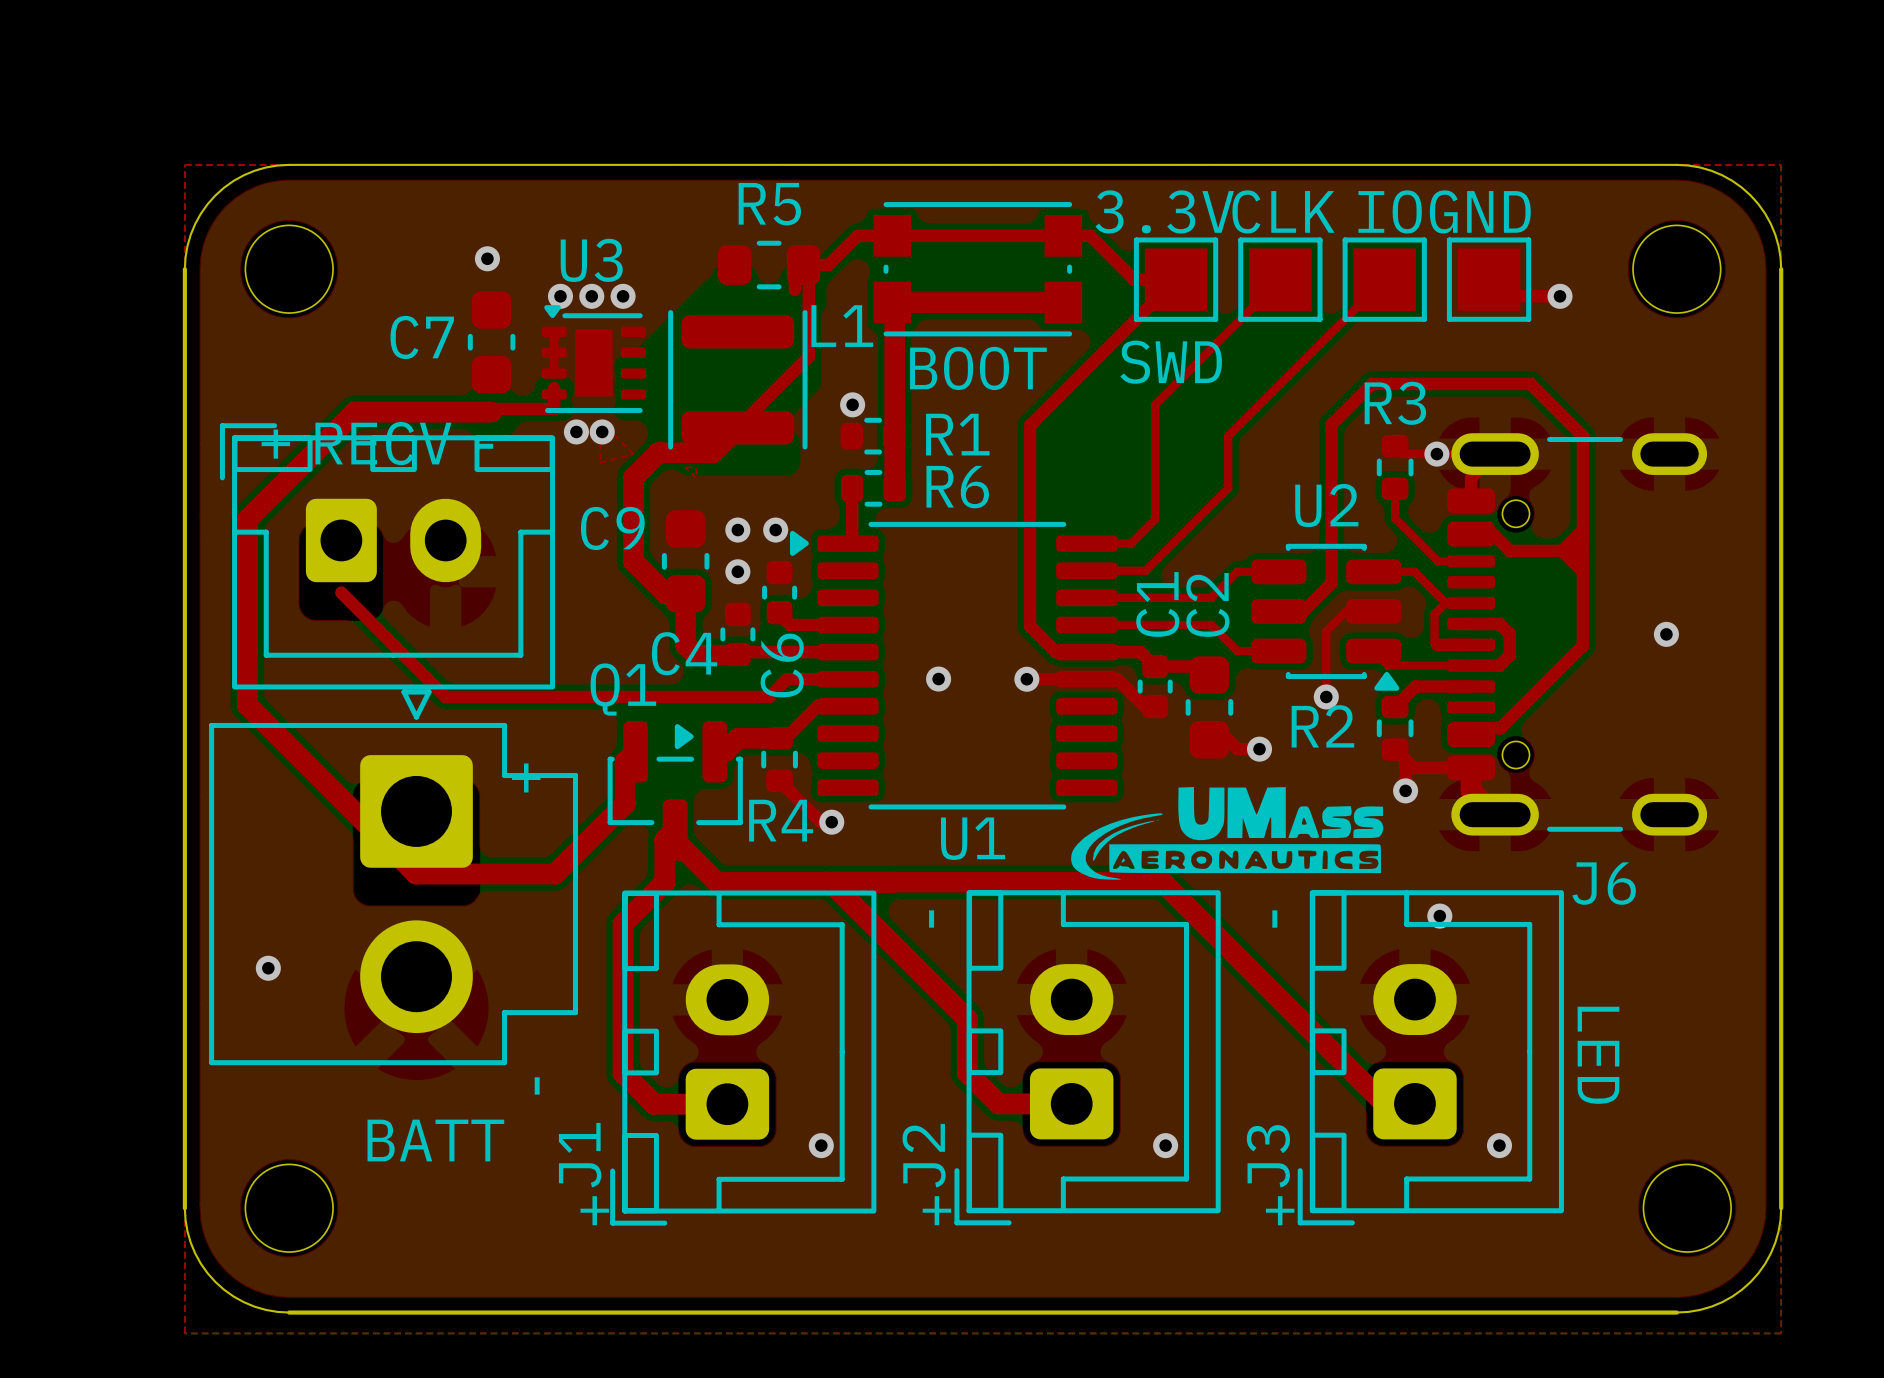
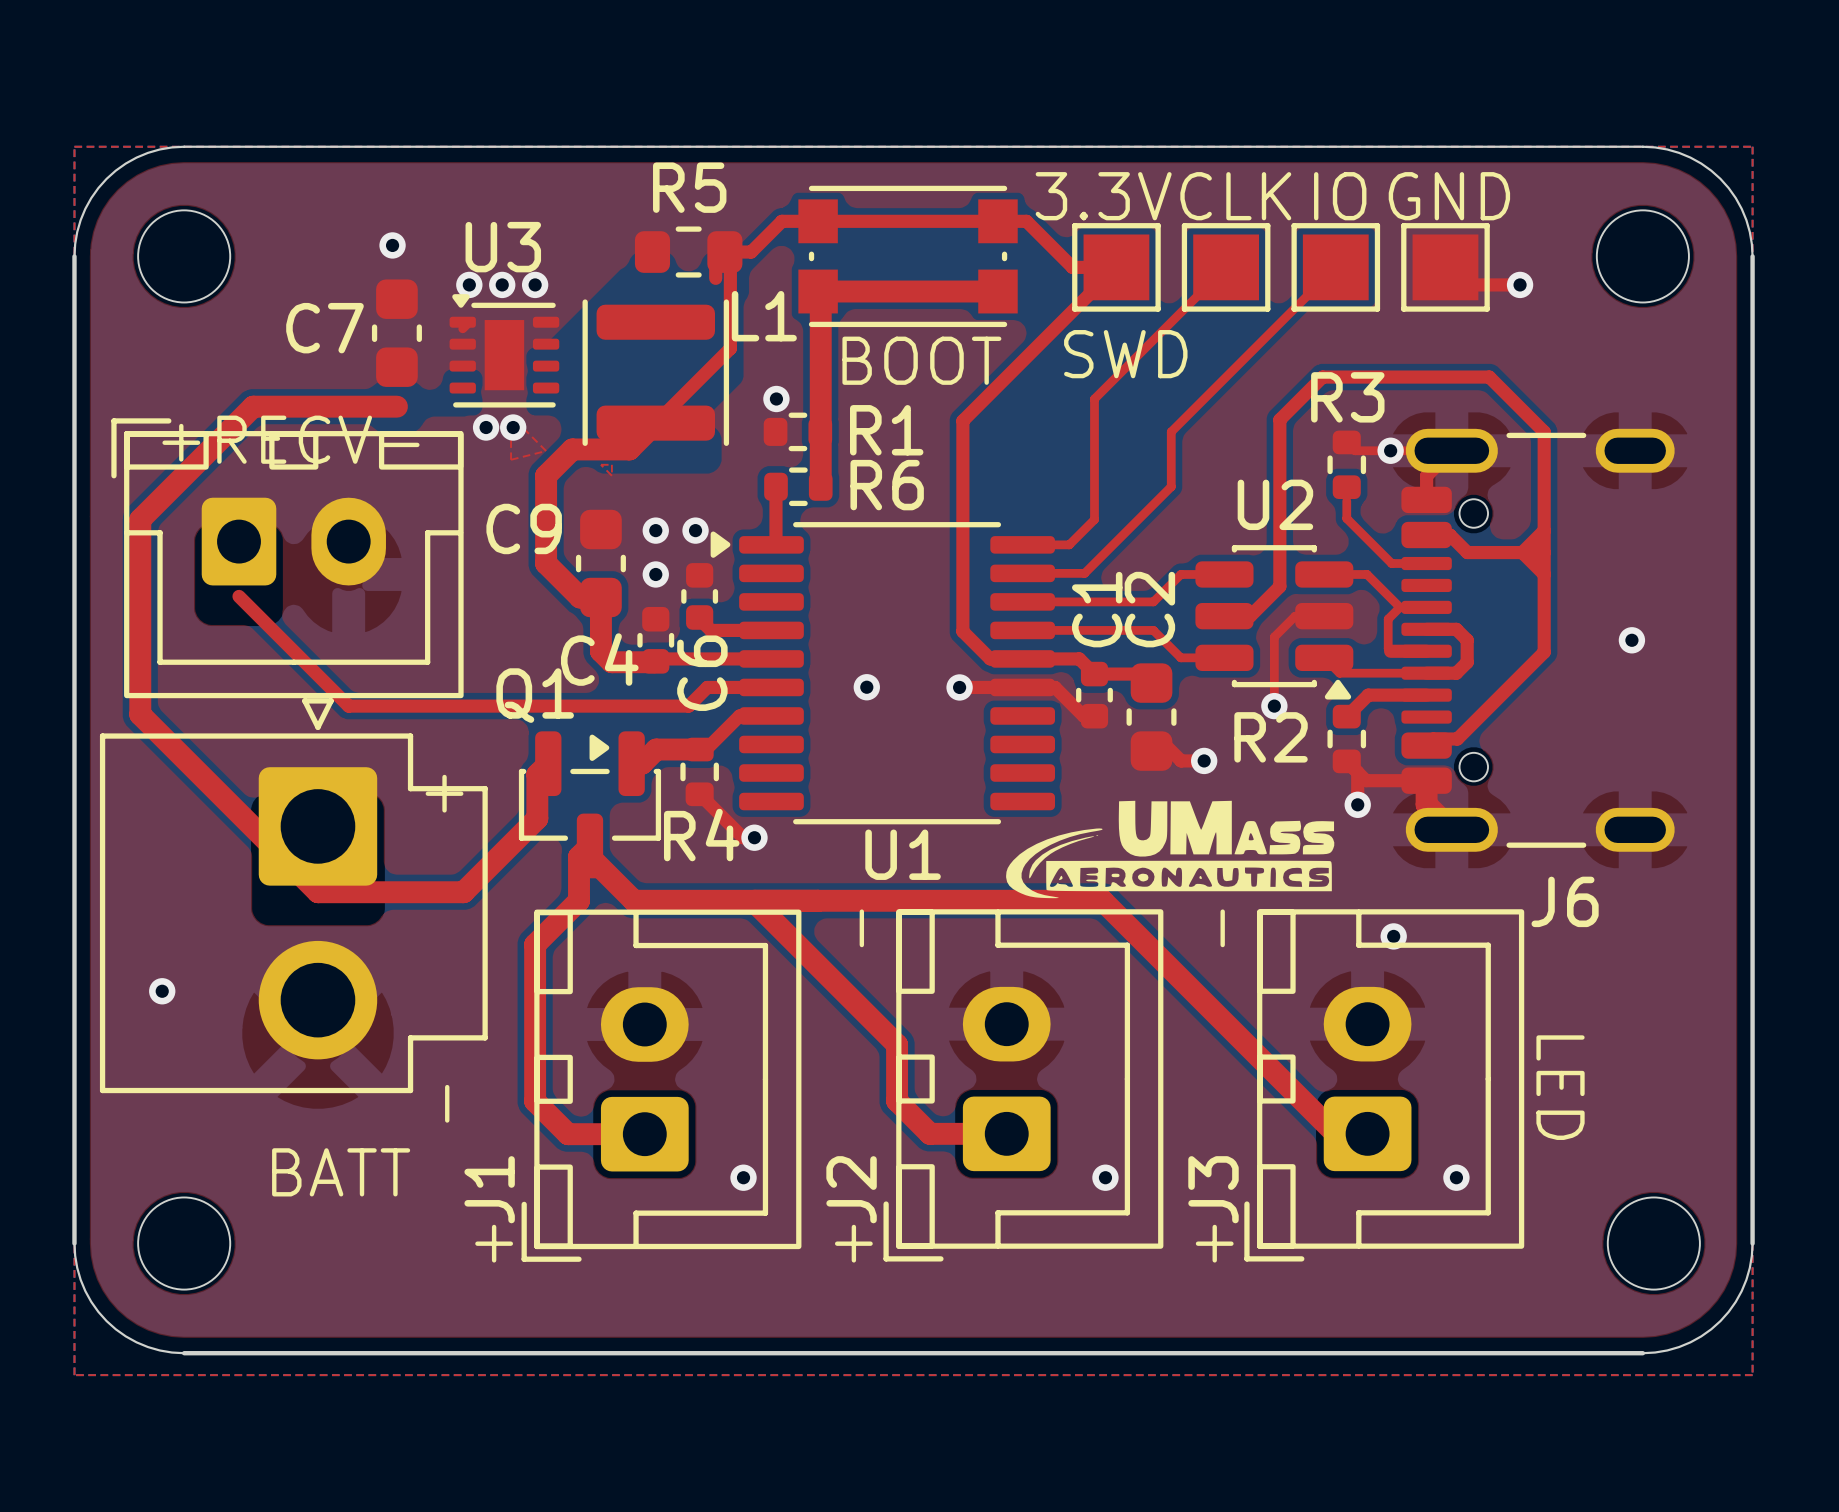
top track: (554, 338) (554, 367) -> none
top track: (554, 388) (554, 409) (494, 409) -> none

